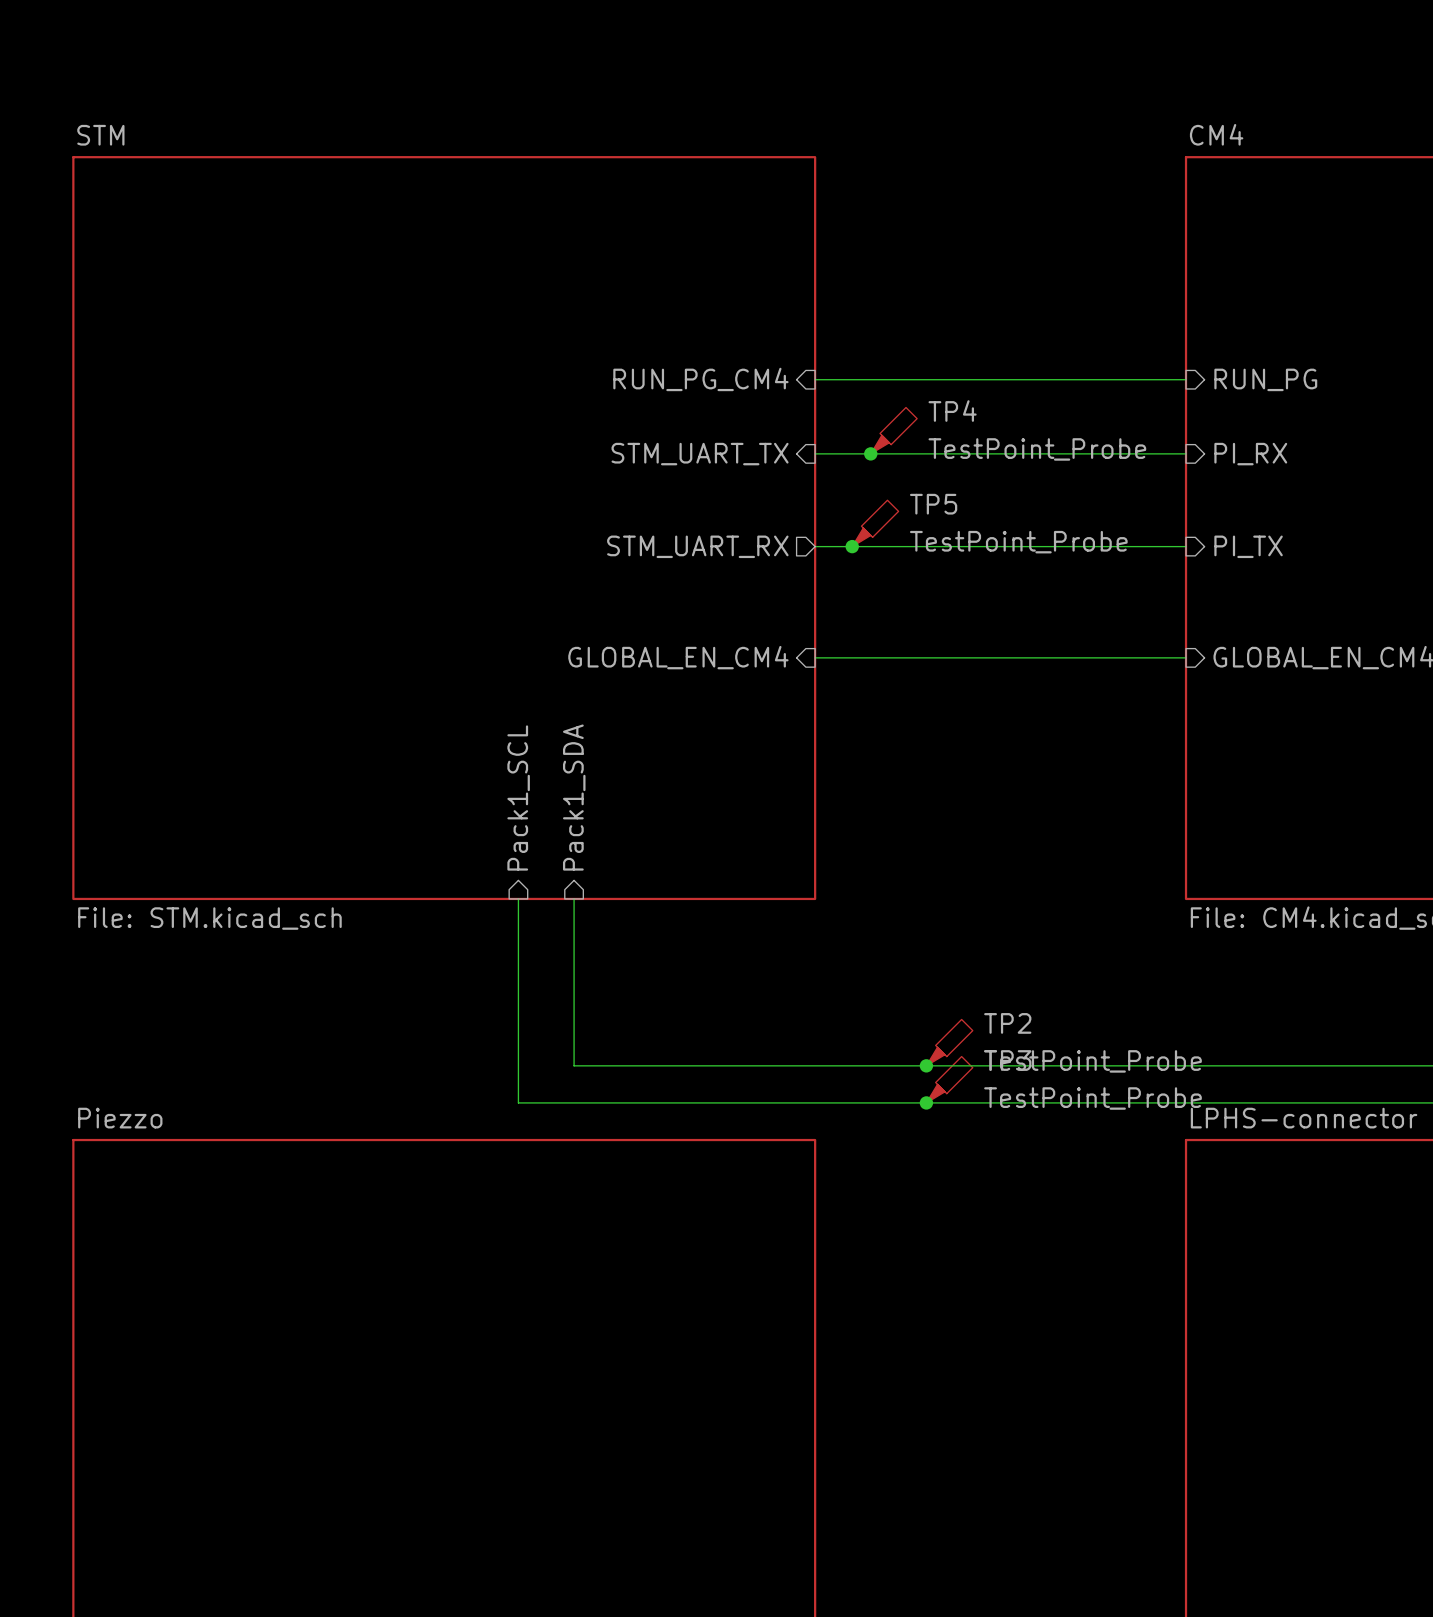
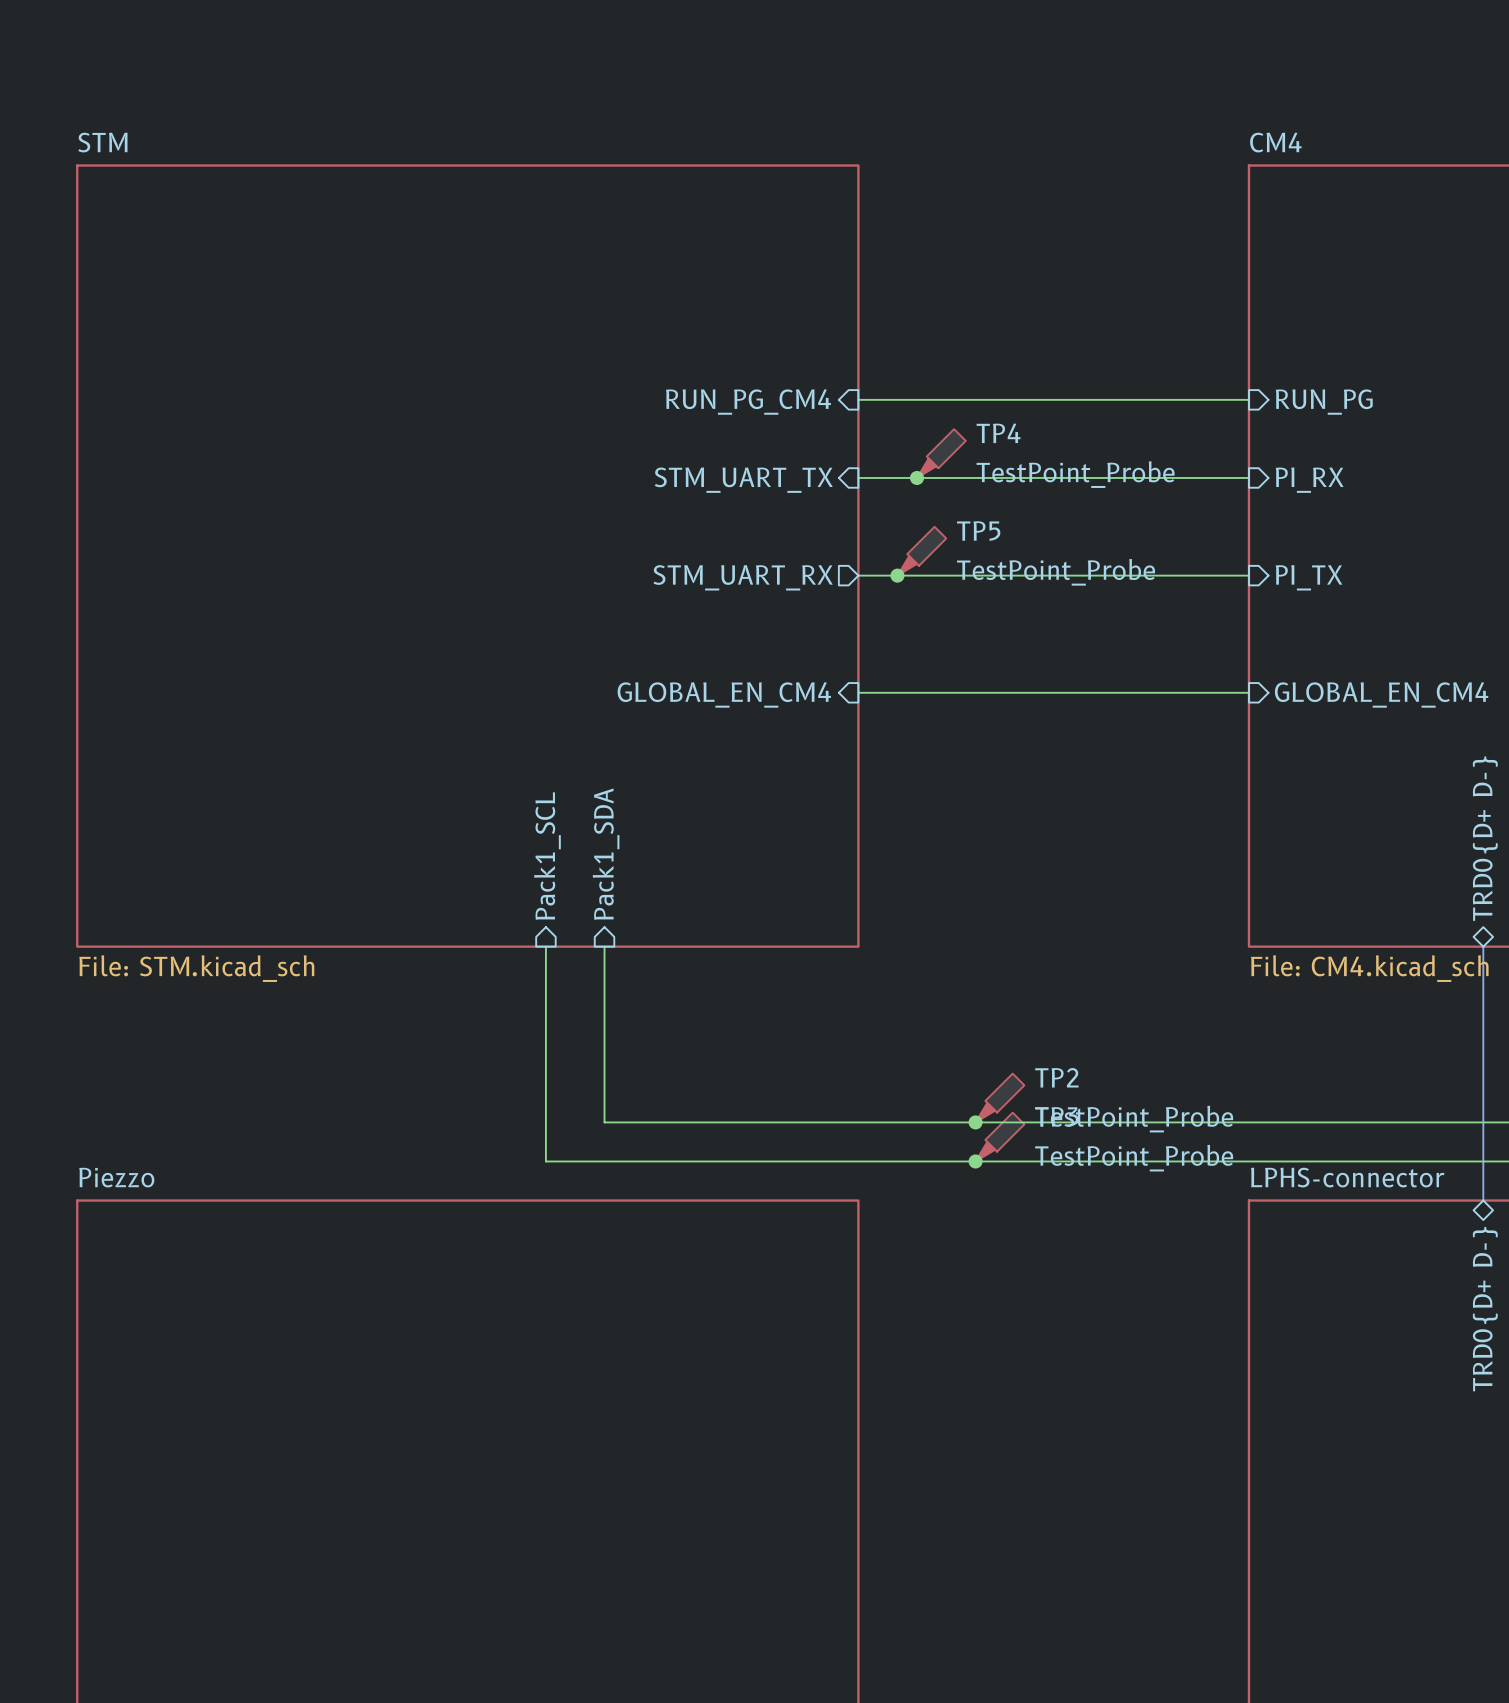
sheet pin: none -> TRD0{D+ D-} (1485, 838)
bus: none -> (1483, 946) (1483, 1200)
sheet pin: none -> TRD0{D+ D-} (1485, 1309)

